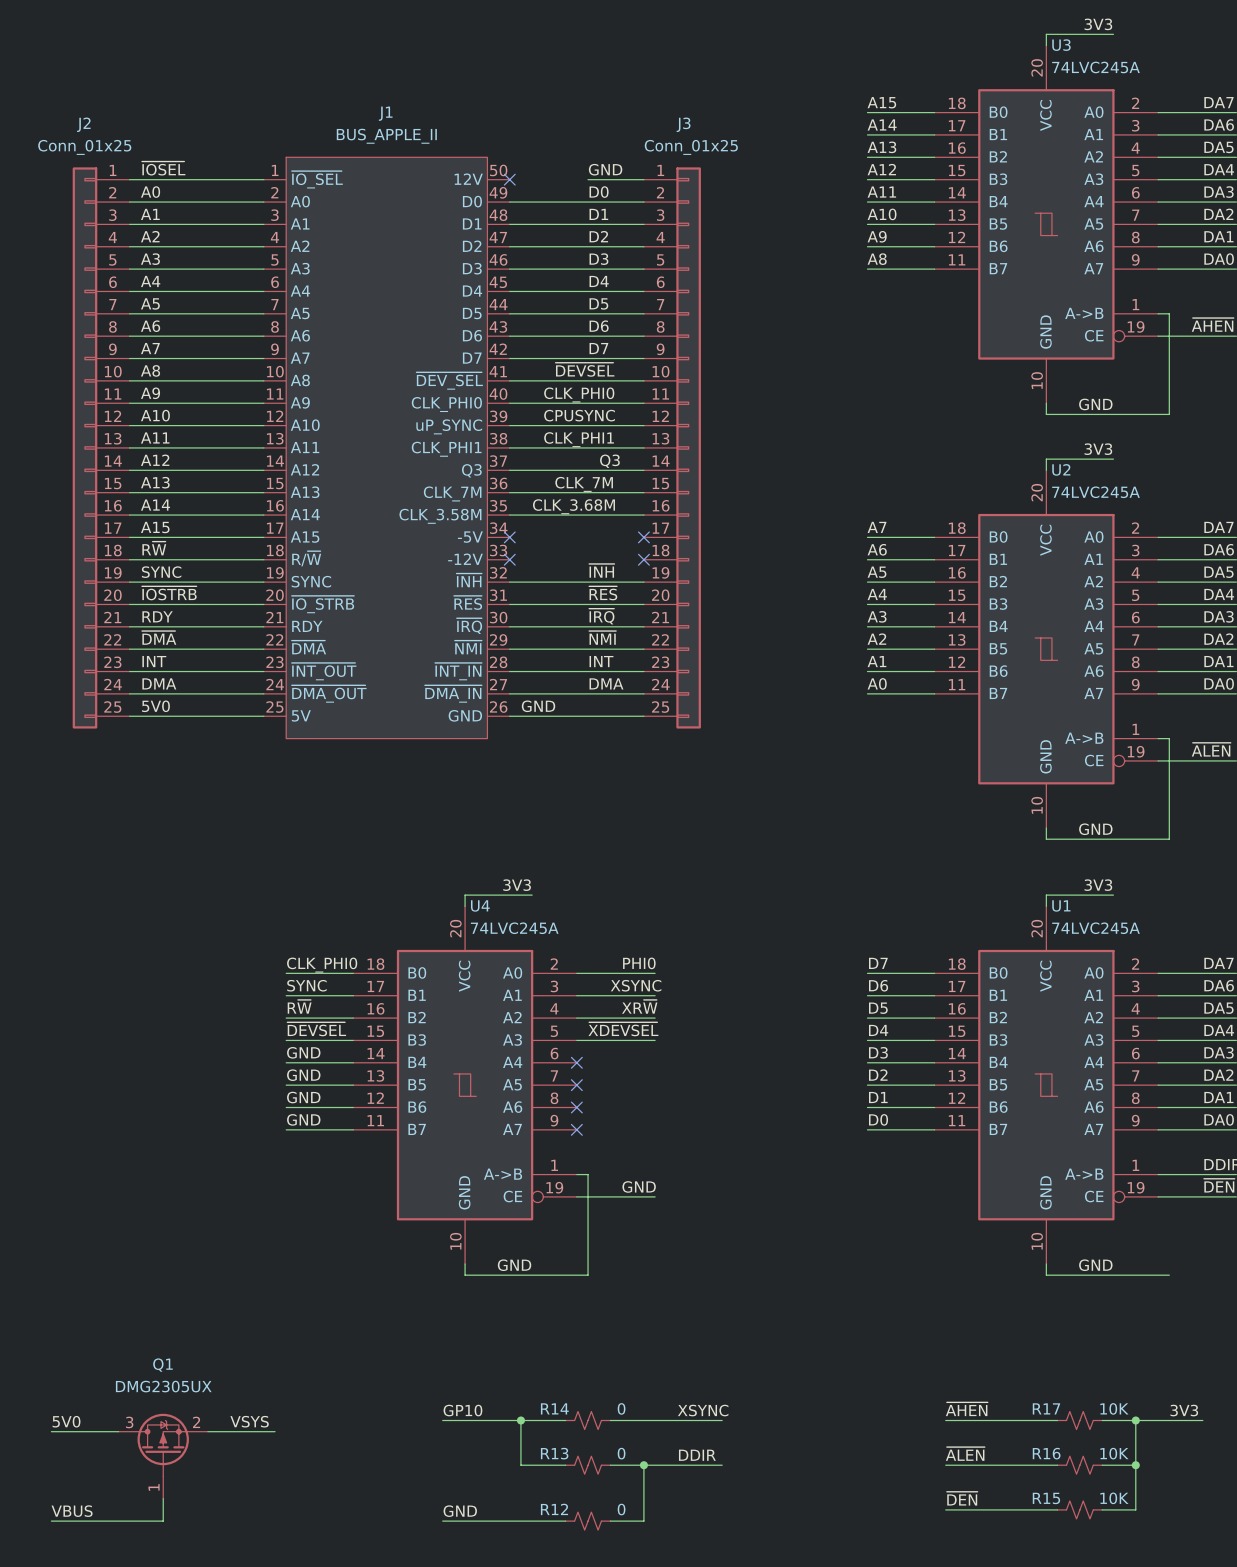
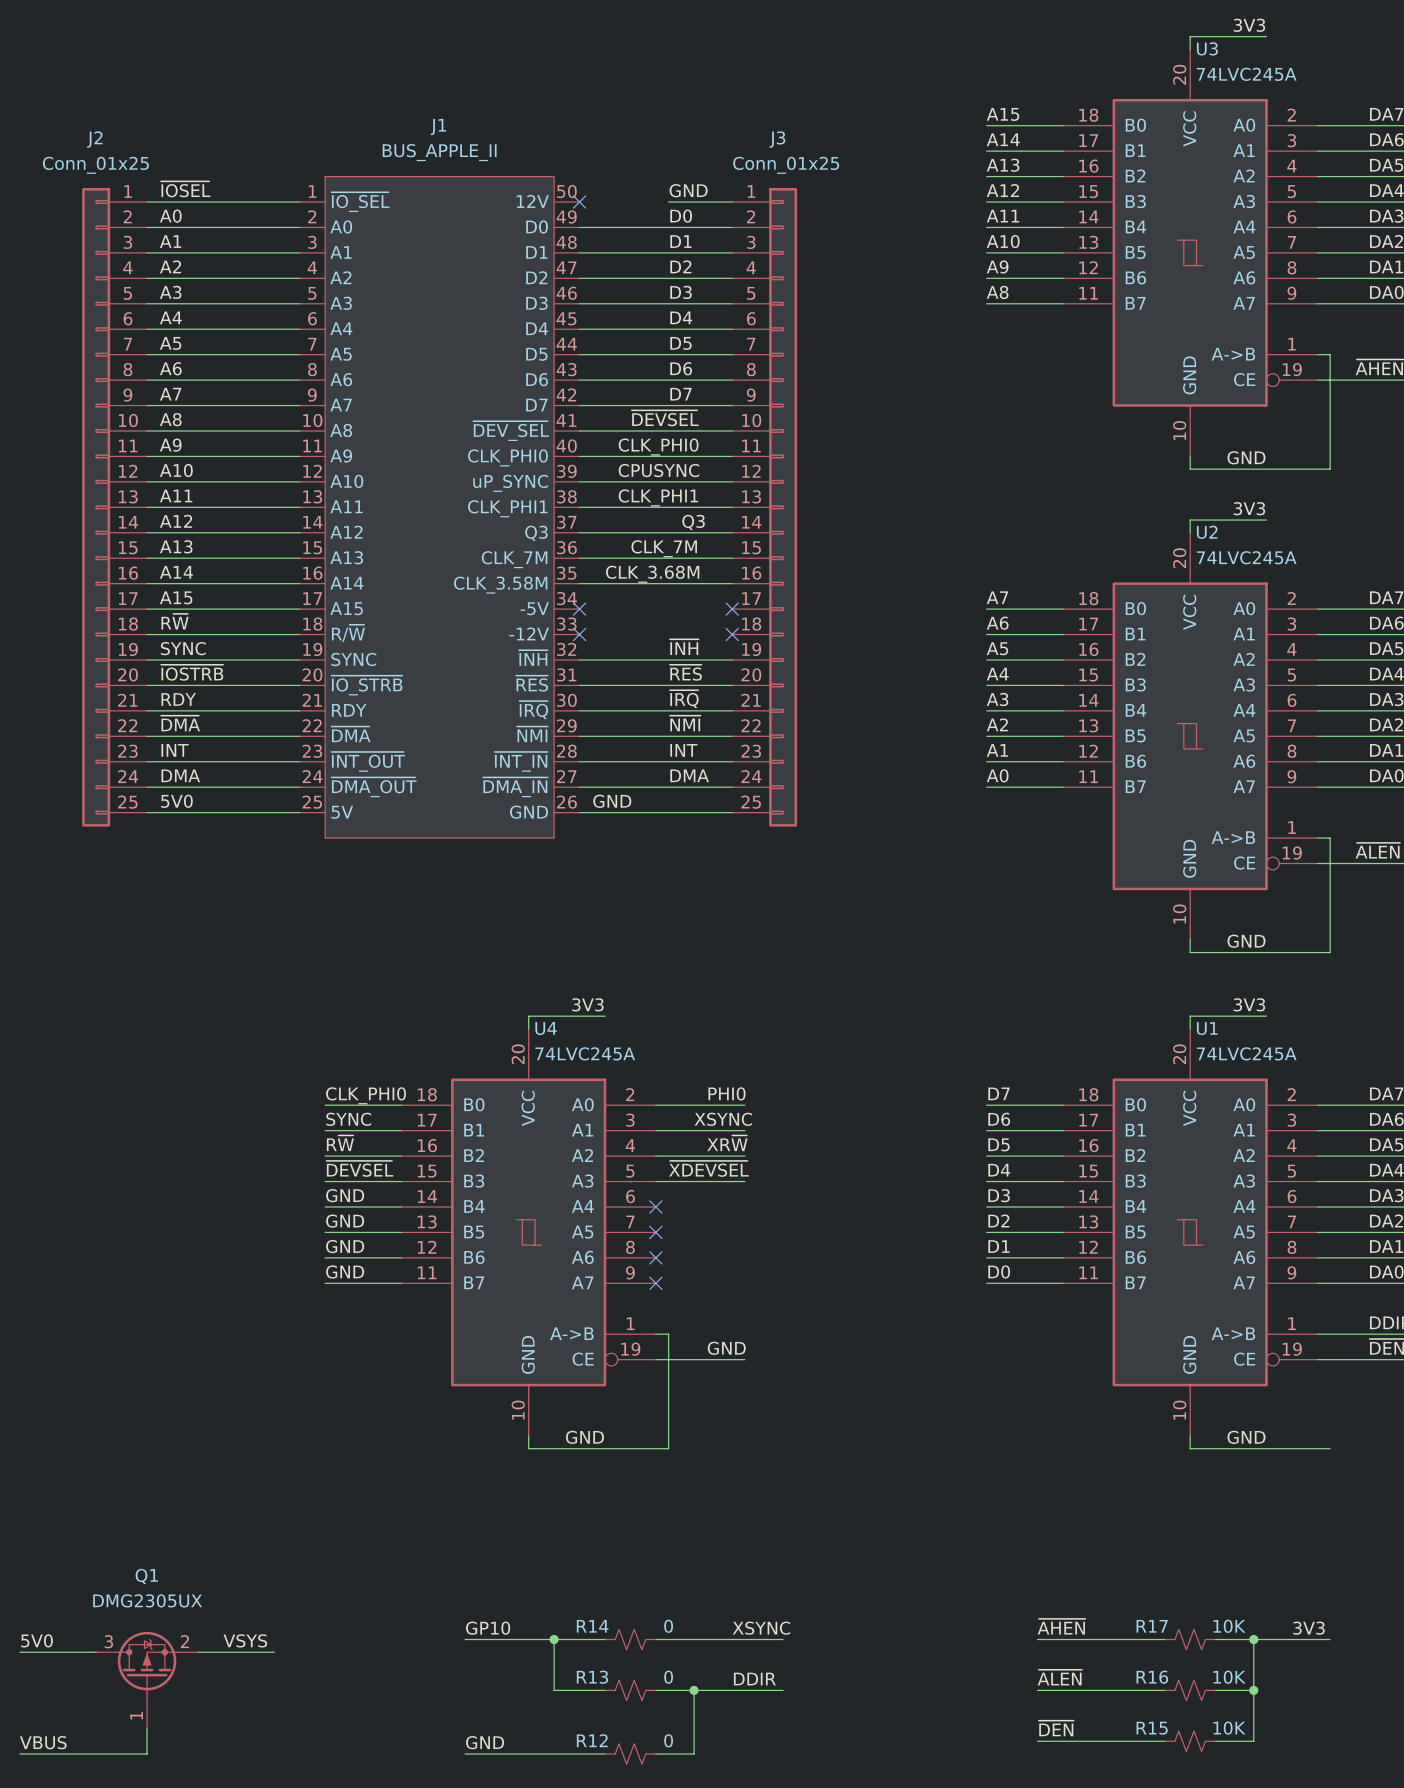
label position: ~{AHEN} (966, 1409) -> ~{AHEN} (1061, 1626)
label position: GP10 (462, 1410) -> GP10 (488, 1628)
label position: XSYNC (703, 1410) -> XSYNC (761, 1628)
label position: 3V3 (1184, 1410) -> 3V3 (1308, 1628)
wire: (442, 1420) (565, 1420) -> (465, 1639) (605, 1639)
wire: (520, 1420) (520, 1465) (565, 1465) -> (554, 1639) (554, 1690) (605, 1690)
junction position: (520, 1420) -> (554, 1639)
R14 position: (588, 1420) -> (630, 1639)
wire: (610, 1420) (722, 1420) -> (655, 1639) (783, 1639)
wire: (945, 1420) (1057, 1420) -> (1037, 1639) (1164, 1639)
R17 position: (1079, 1420) -> (1190, 1639)
wire: (1102, 1420) (1202, 1420) -> (1215, 1639) (1330, 1639)
wire: (1135, 1420) (1135, 1509) (1102, 1509) -> (1253, 1639) (1253, 1741) (1215, 1741)
junction: (1135, 1420) -> none
label position: 5V0 (66, 1421) -> 5V0 (37, 1640)
label position: VSYS (249, 1421) -> VSYS (245, 1640)
wire: (51, 1431) (118, 1431) -> (19, 1652) (96, 1652)
wire: (207, 1431) (275, 1431) -> (197, 1652) (274, 1652)
junction: none -> (1253, 1639)
label position: ~{ALEN} (965, 1453) -> ~{ALEN} (1059, 1677)
label position: DDIR (697, 1455) -> DDIR (754, 1679)
Q1 position: (163, 1456) -> (147, 1680)
R13 position: (588, 1465) -> (630, 1690)
wire: (610, 1465) (722, 1465) -> (655, 1690) (783, 1690)
wire: (643, 1465) (643, 1521) (610, 1521) -> (694, 1690) (694, 1754) (655, 1754)
junction position: (643, 1465) -> (694, 1690)
wire: (945, 1465) (1057, 1465) -> (1037, 1690) (1164, 1690)
R16 position: (1079, 1465) -> (1190, 1690)
wire: (1102, 1465) (1135, 1465) -> (1215, 1690) (1253, 1690)
junction: (1135, 1465) -> none
junction: none -> (1253, 1690)
wire: (163, 1498) (163, 1521) (51, 1521) -> (147, 1728) (147, 1754) (19, 1754)
label position: ~{DEN} (962, 1498) -> ~{DEN} (1056, 1728)
wire: (945, 1509) (1057, 1509) -> (1037, 1741) (1164, 1741)
R15 position: (1079, 1509) -> (1190, 1741)
label position: VBUS (72, 1511) -> VBUS (43, 1742)
label position: GND (460, 1511) -> GND (485, 1742)
wire: (442, 1521) (565, 1521) -> (465, 1754) (605, 1754)
R12 position: (588, 1521) -> (630, 1754)

